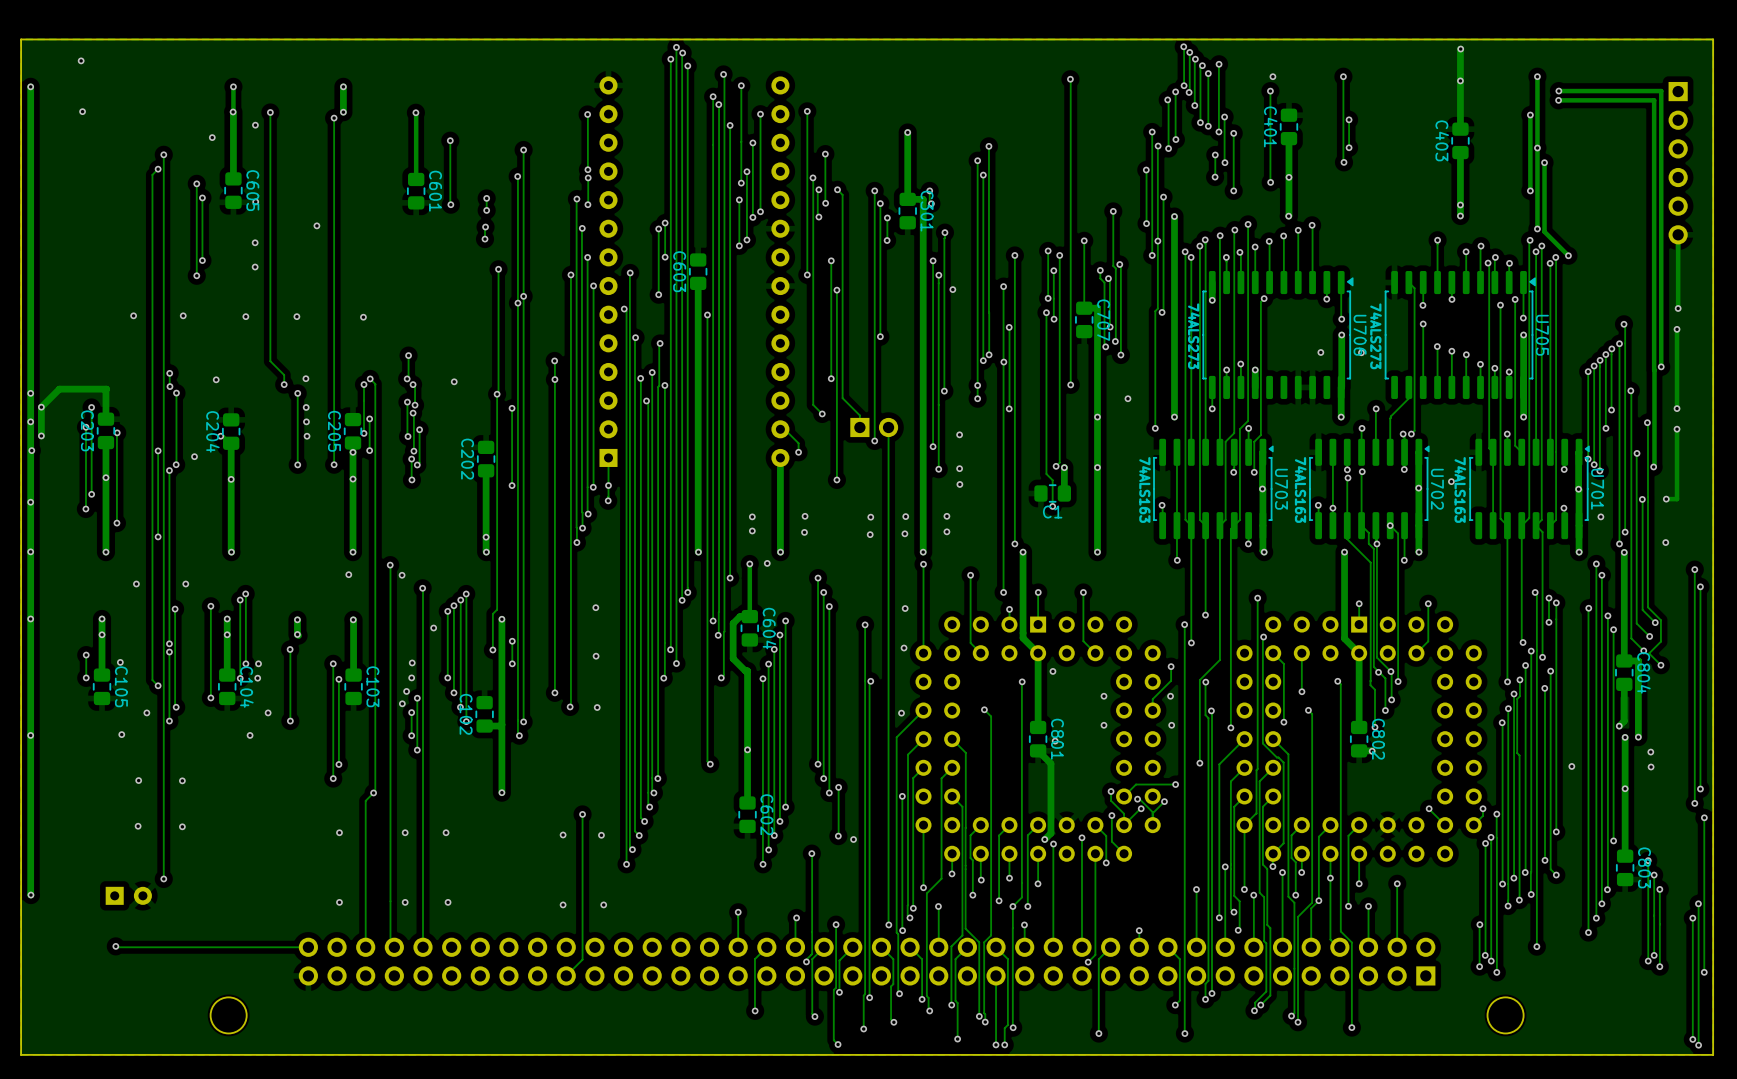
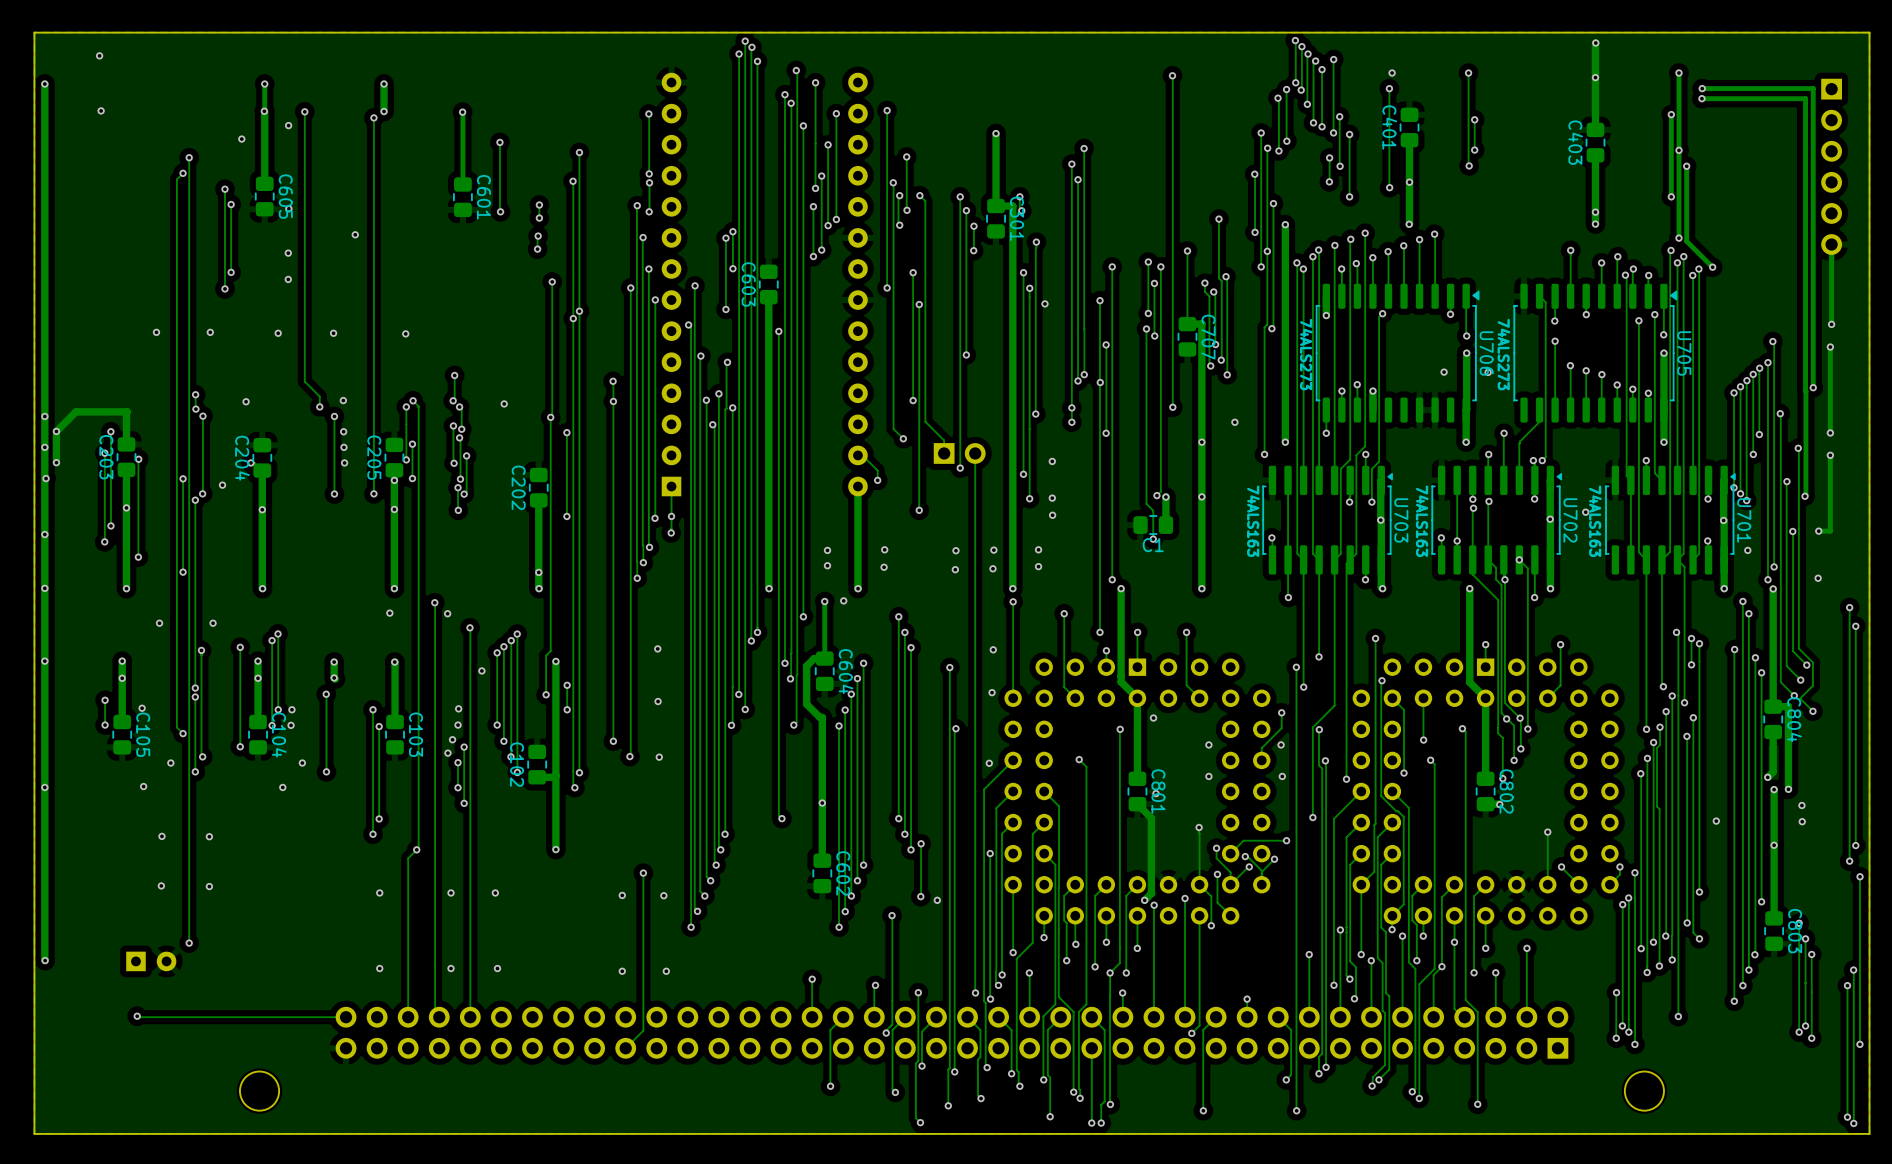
track: none -> (1199, 827) (1199, 884)
via: none -> (1199, 827)
track: none -> (1547, 832) (1547, 884)
via: none -> (1547, 832)

